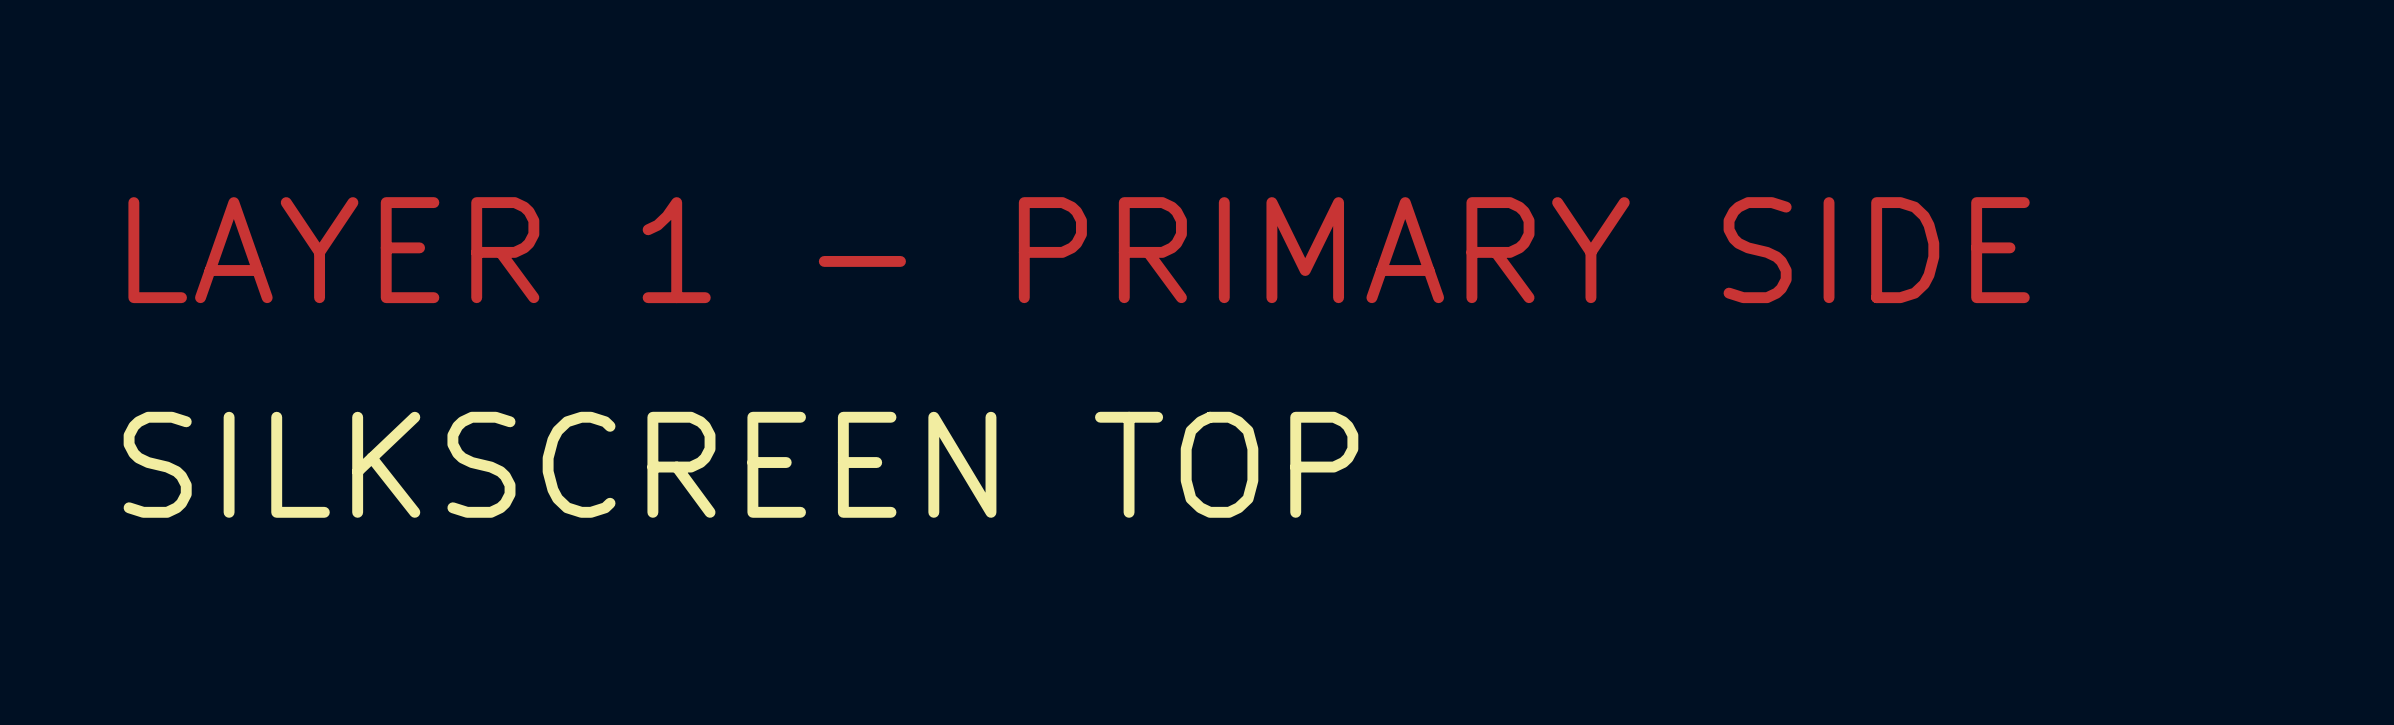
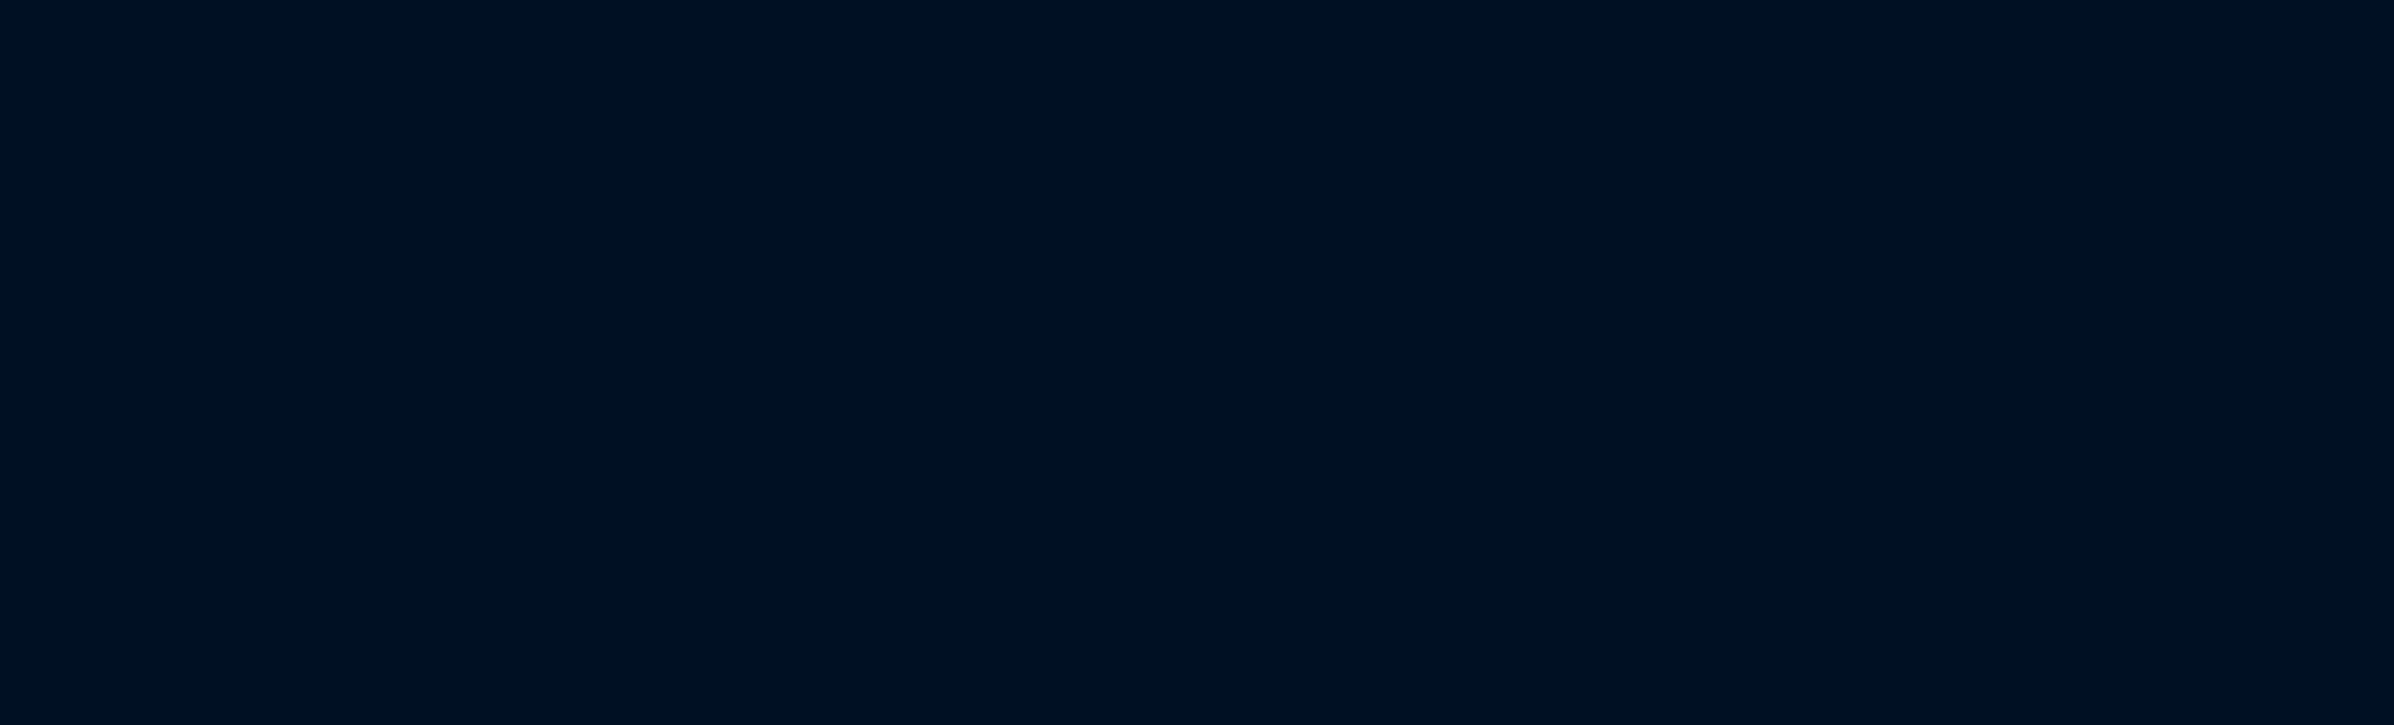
text: LAYER 1 - PRIMARY SIDE (1079, 250) -> none
text: SILKSCREEN TOP (740, 464) -> none

